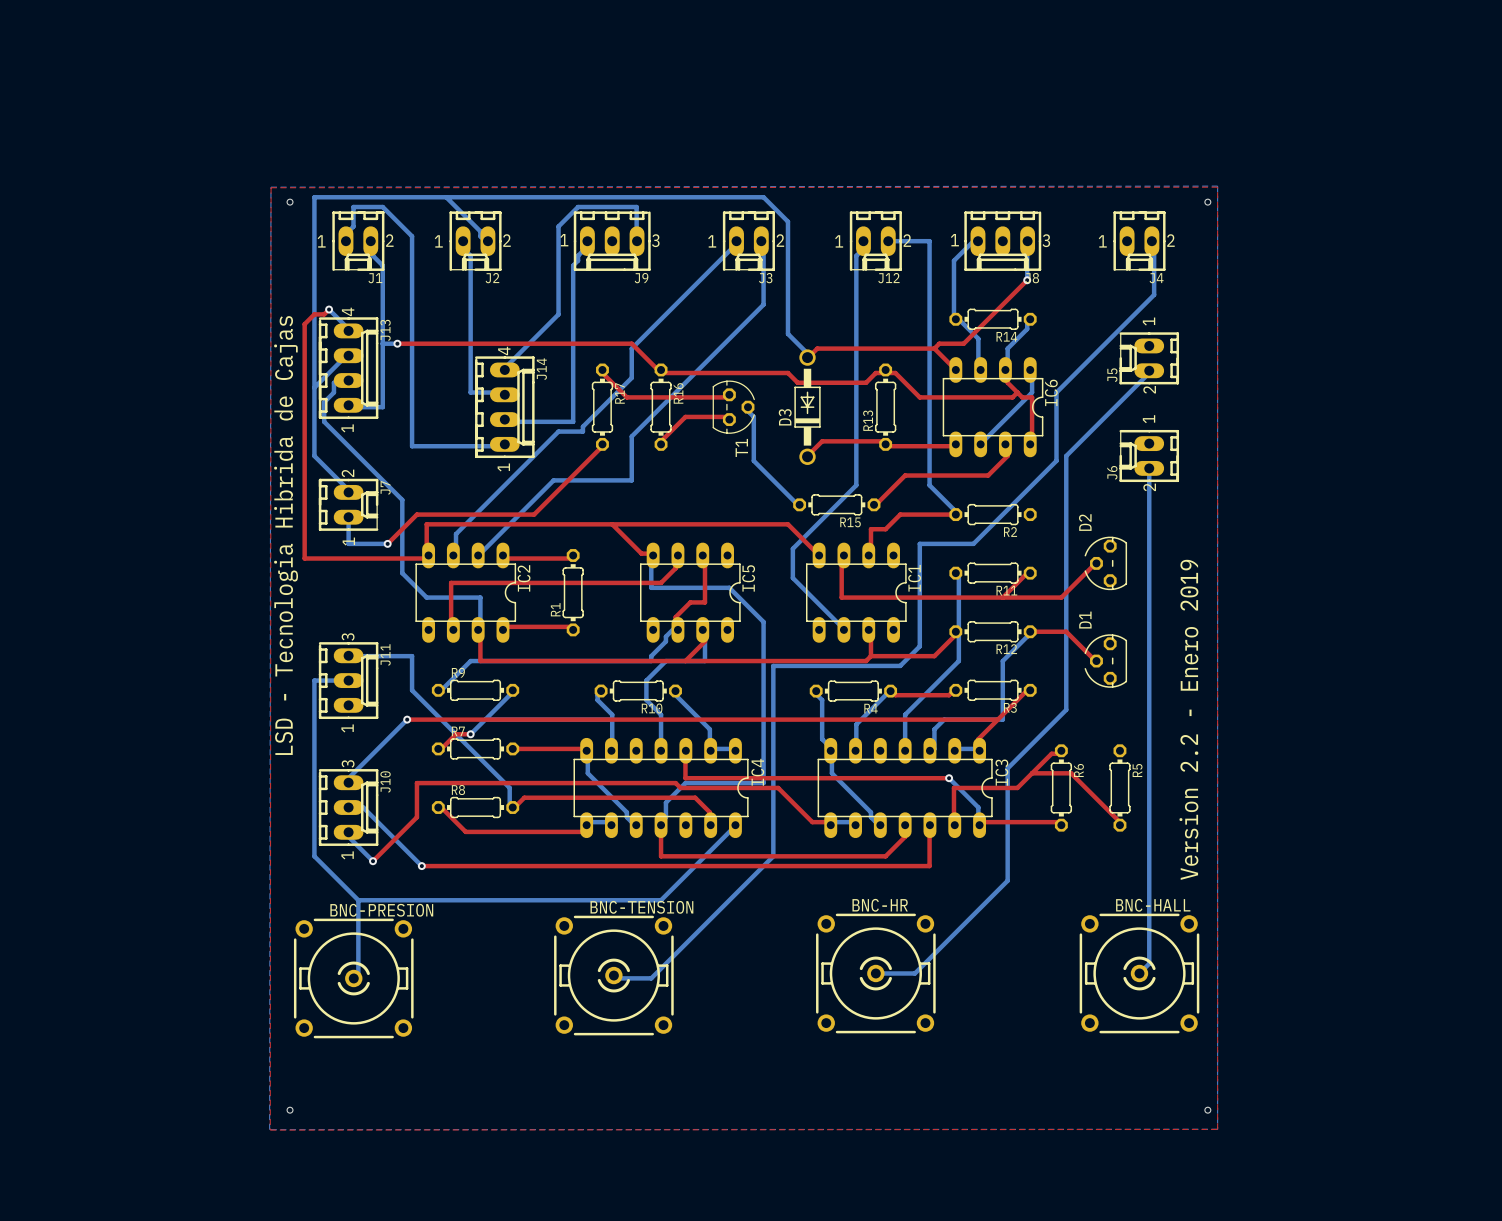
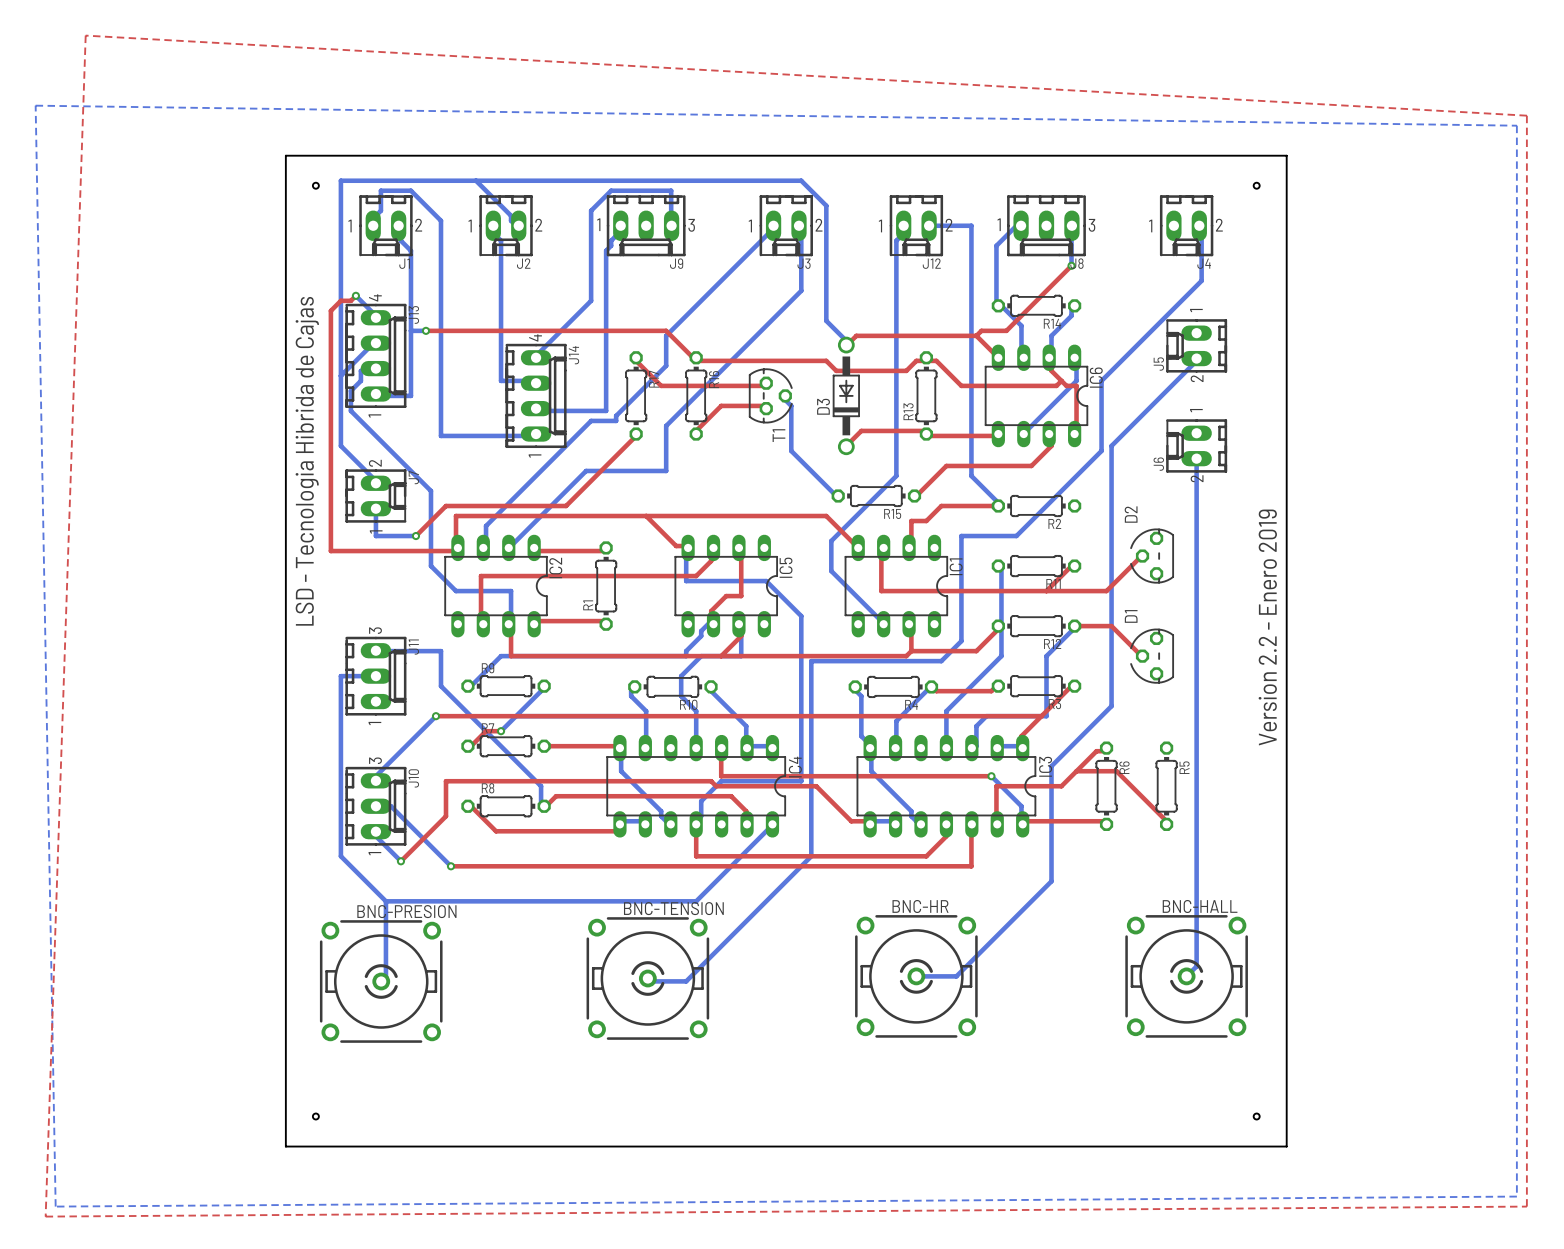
board edge: none -> (285, 155) (1286, 155) (1286, 1146) (285, 1146) (285, 155)
bottom zone outline: (1217, 186) (270, 187) (269, 1129) (1217, 1129) (1217, 186) -> (35, 105) (55, 1206) (1516, 1196) (1516, 125) (35, 105)
top zone outline: (1217, 187) (1217, 1129) (270, 1130) (271, 187) (1217, 187) -> (85, 35) (45, 1216) (1526, 1206) (1526, 115) (85, 35)
text position: LSD - Tecnologia Hibrida de Cajas (286, 535) -> LSD - Tecnologia Hibrida de Cajas (307, 461)
text position: Version 2.2 - Enero 2019 (1188, 719) -> Version 2.2 - Enero 2019 (1267, 627)

